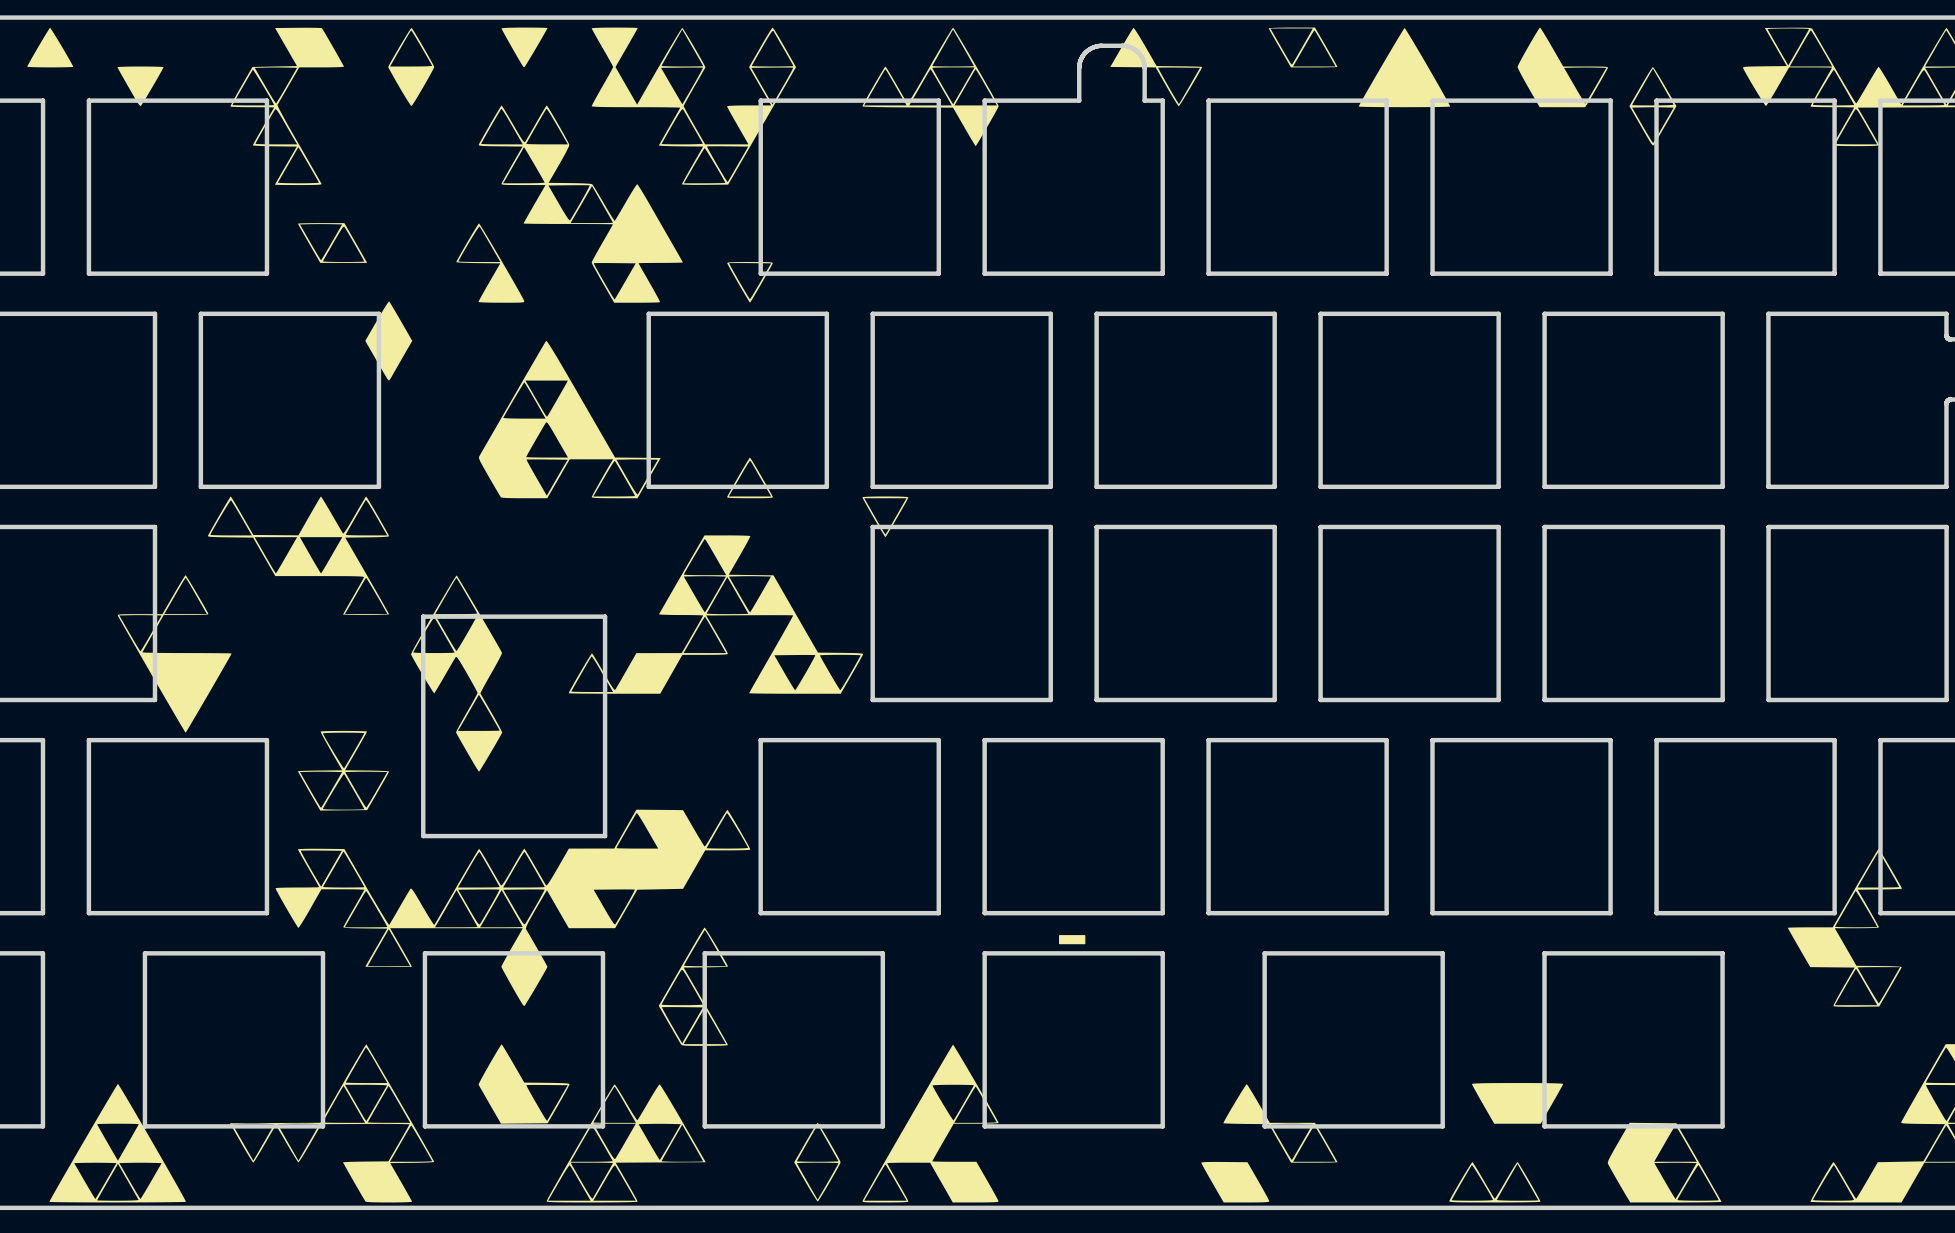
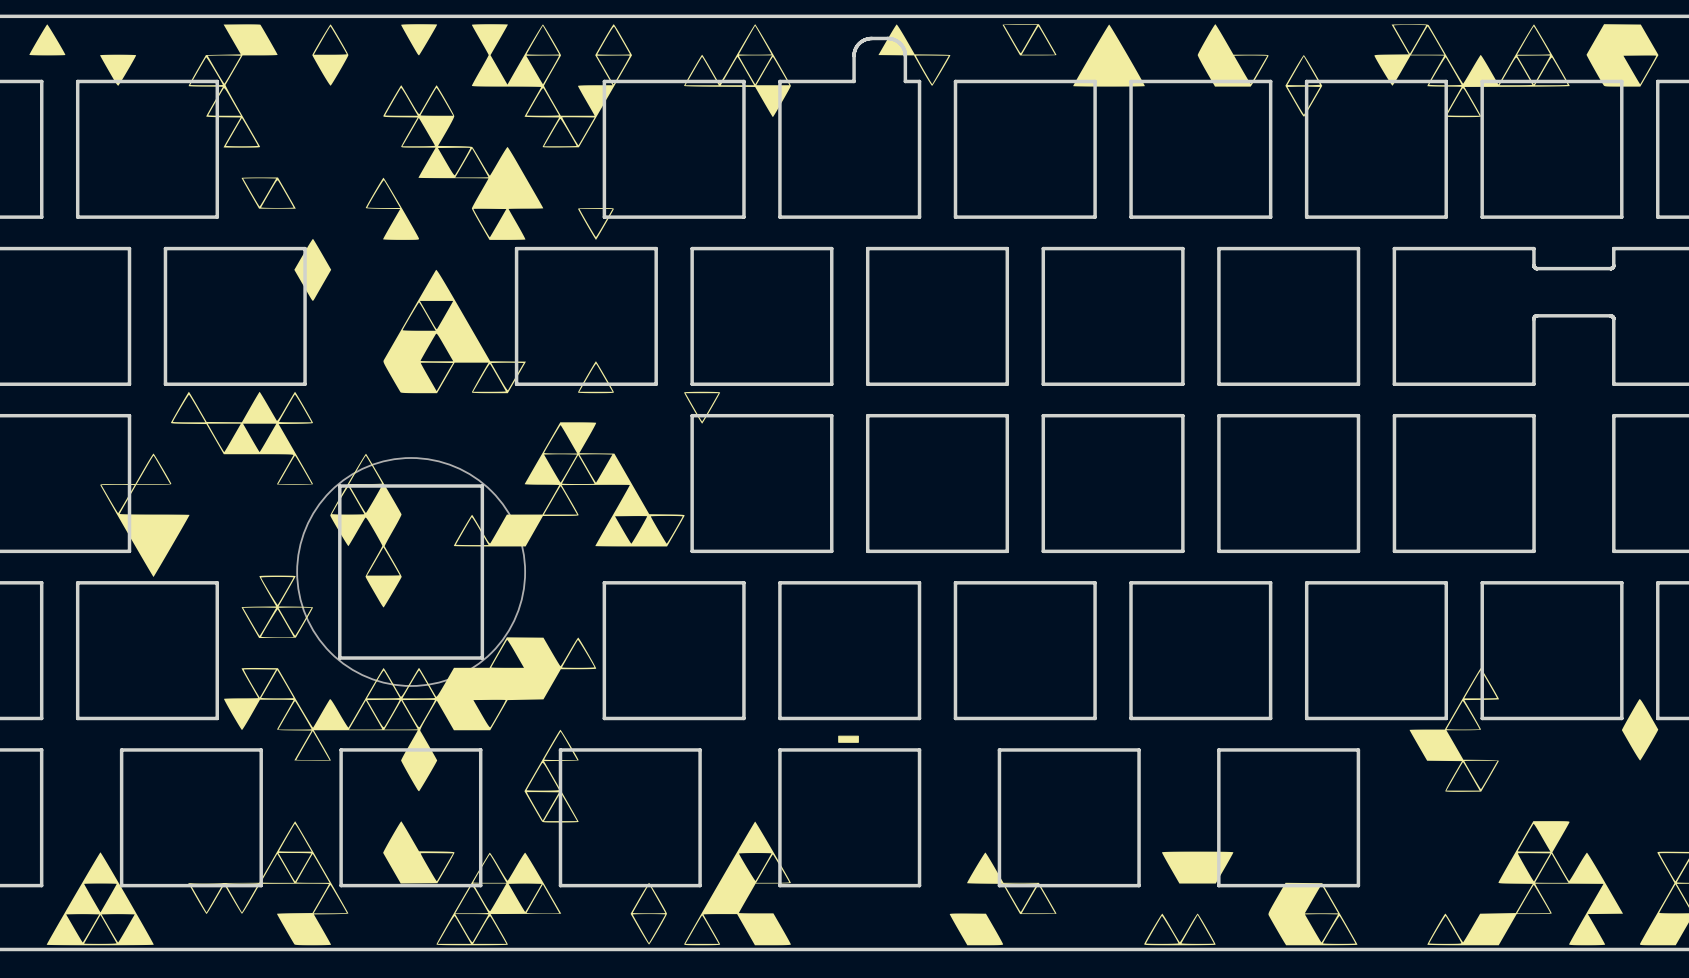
drawing: none -> [296, 457, 526, 687]

